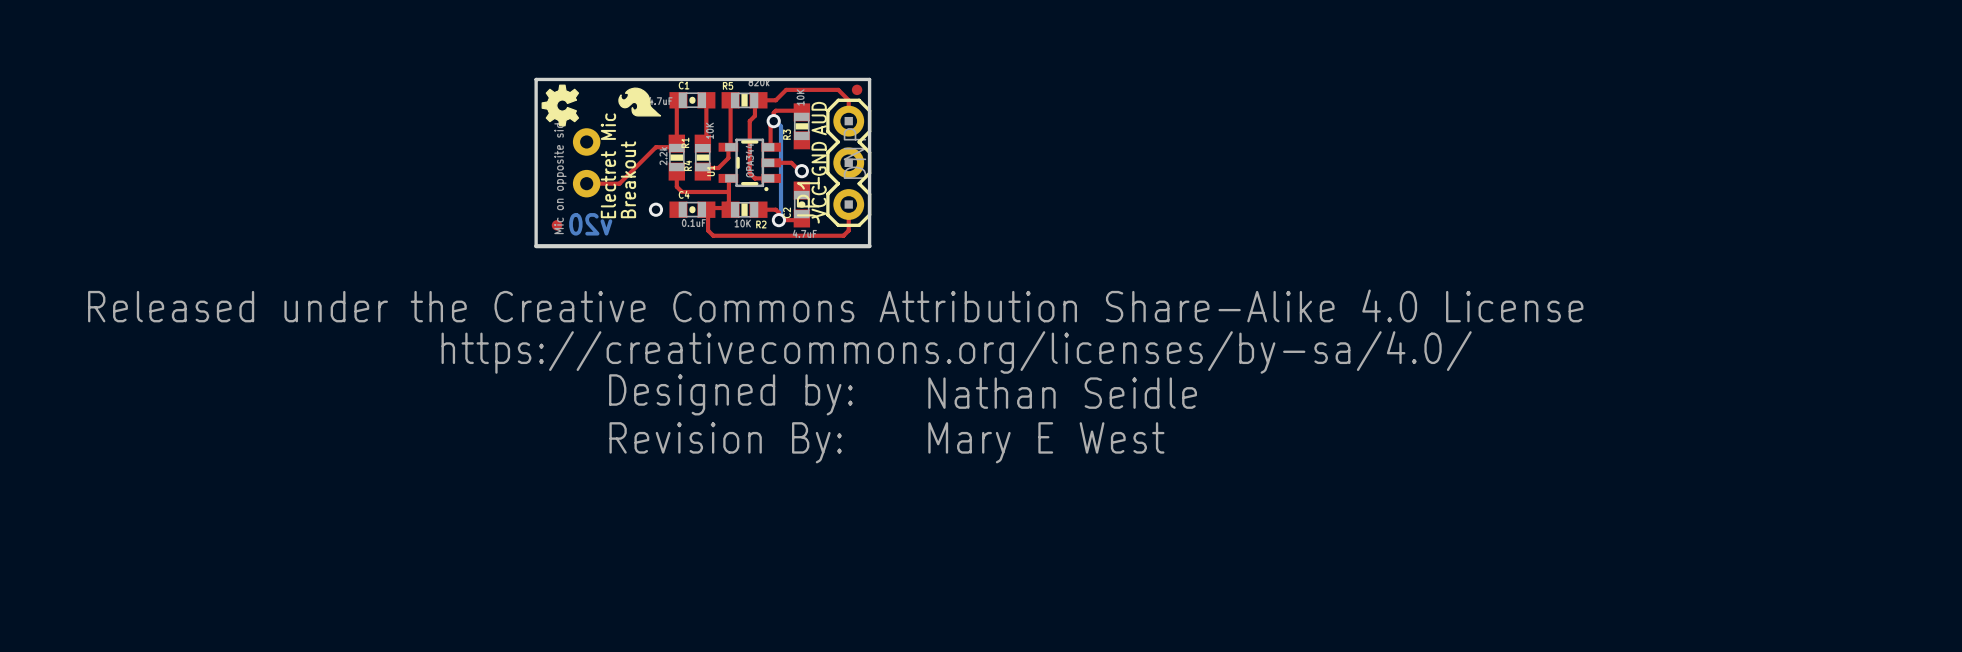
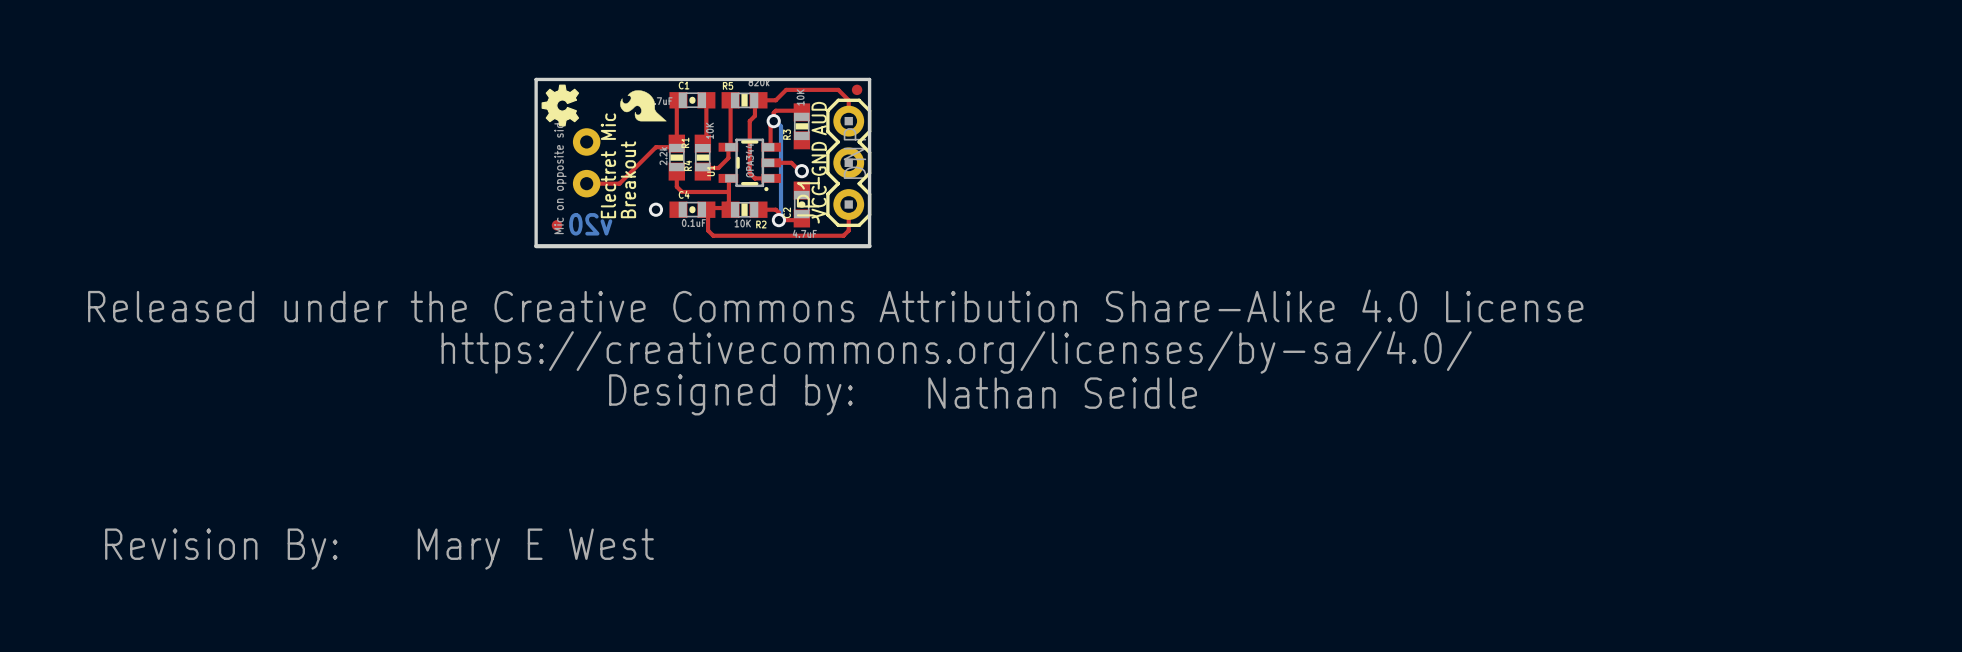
drawing shape: [618, 87, 662, 117] -> [620, 90, 667, 122]
drawing: [609, 422, 842, 464] -> none
text: Mary E West (1046, 442) -> none
drawing: none -> [105, 528, 338, 570]
text: none -> Mary E West (535, 549)

